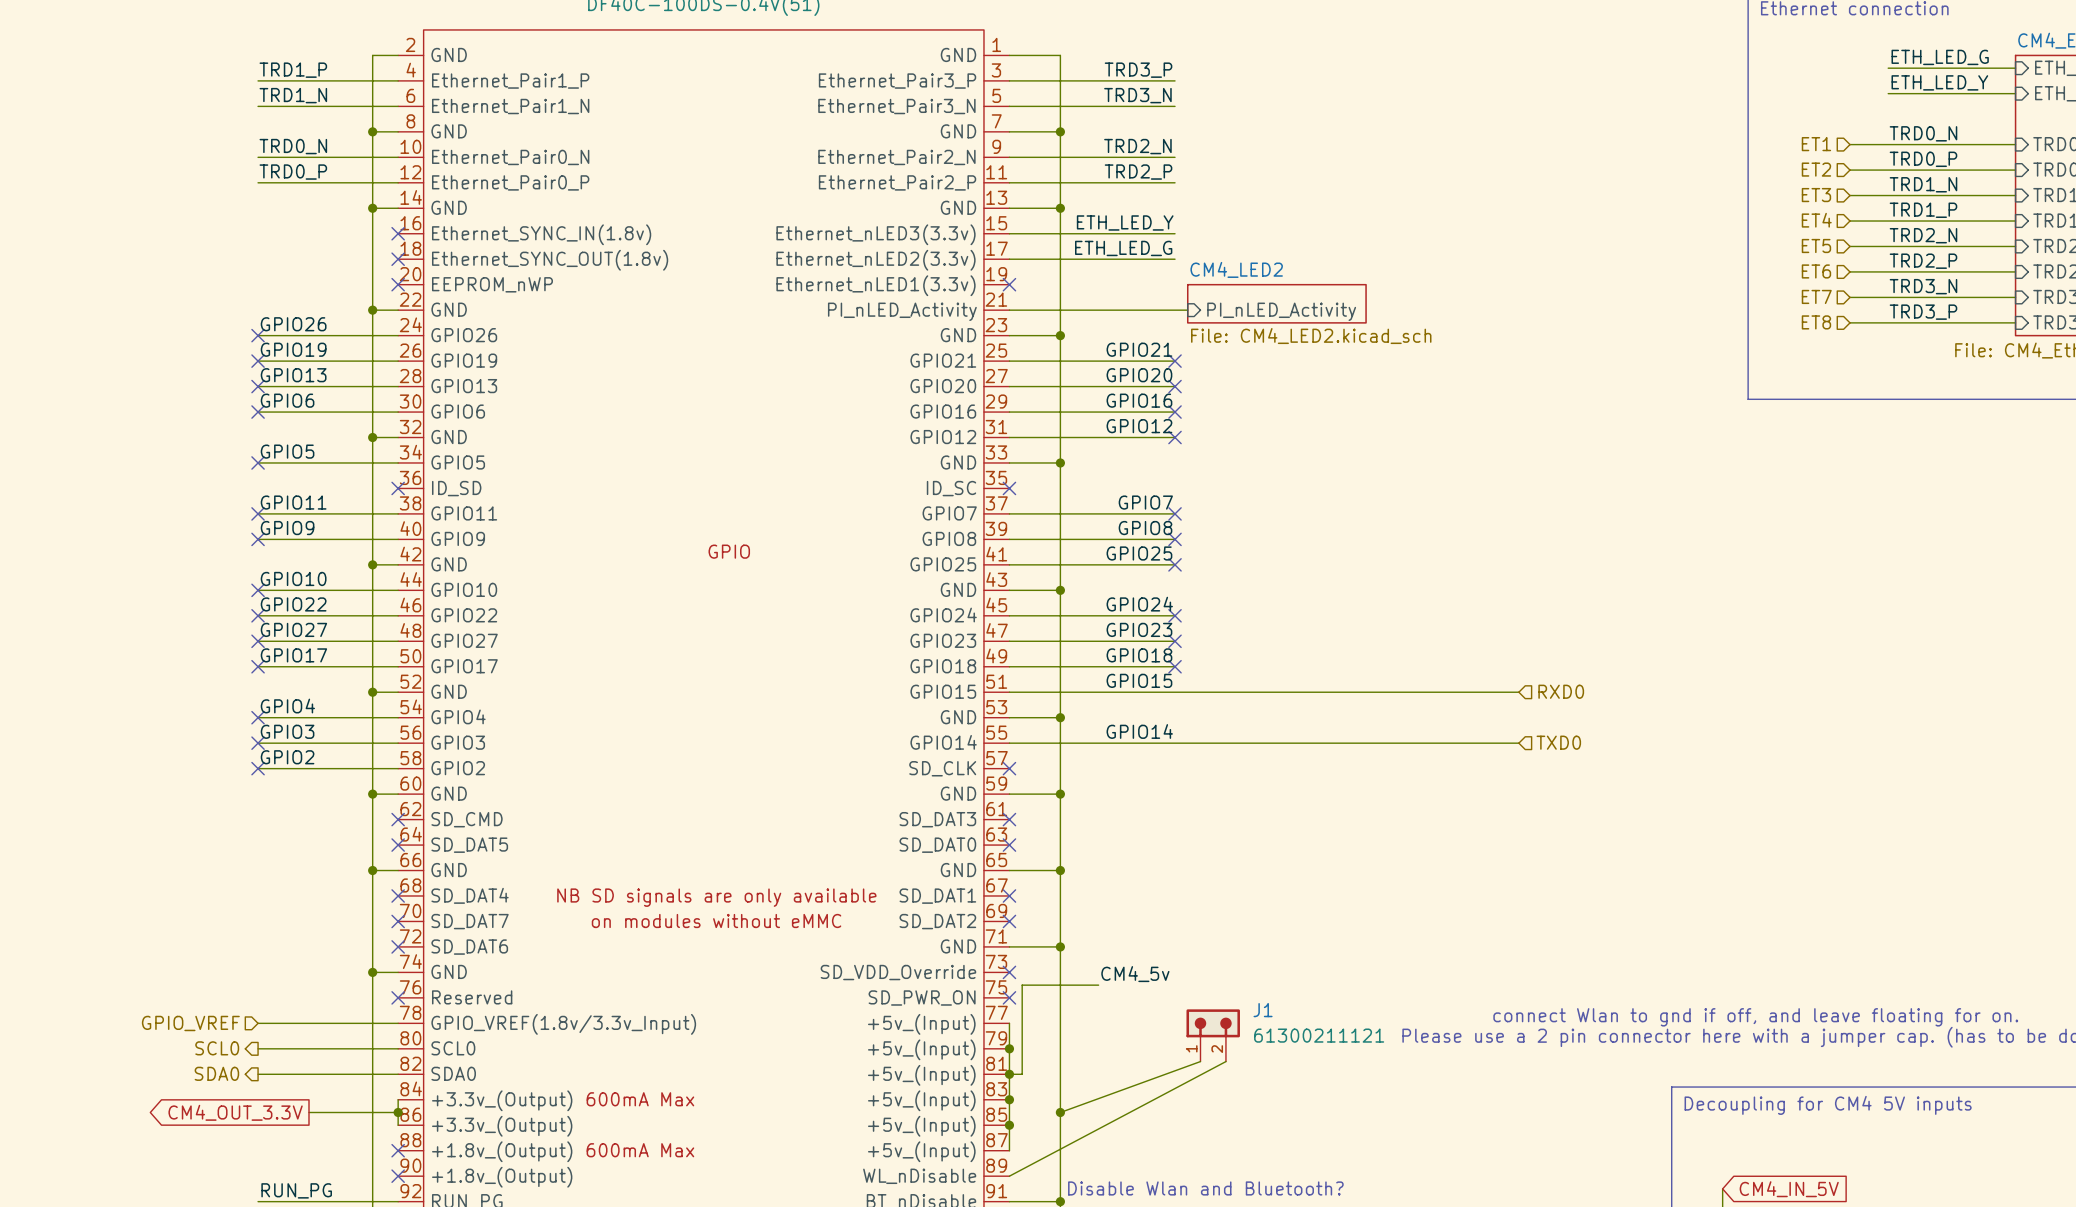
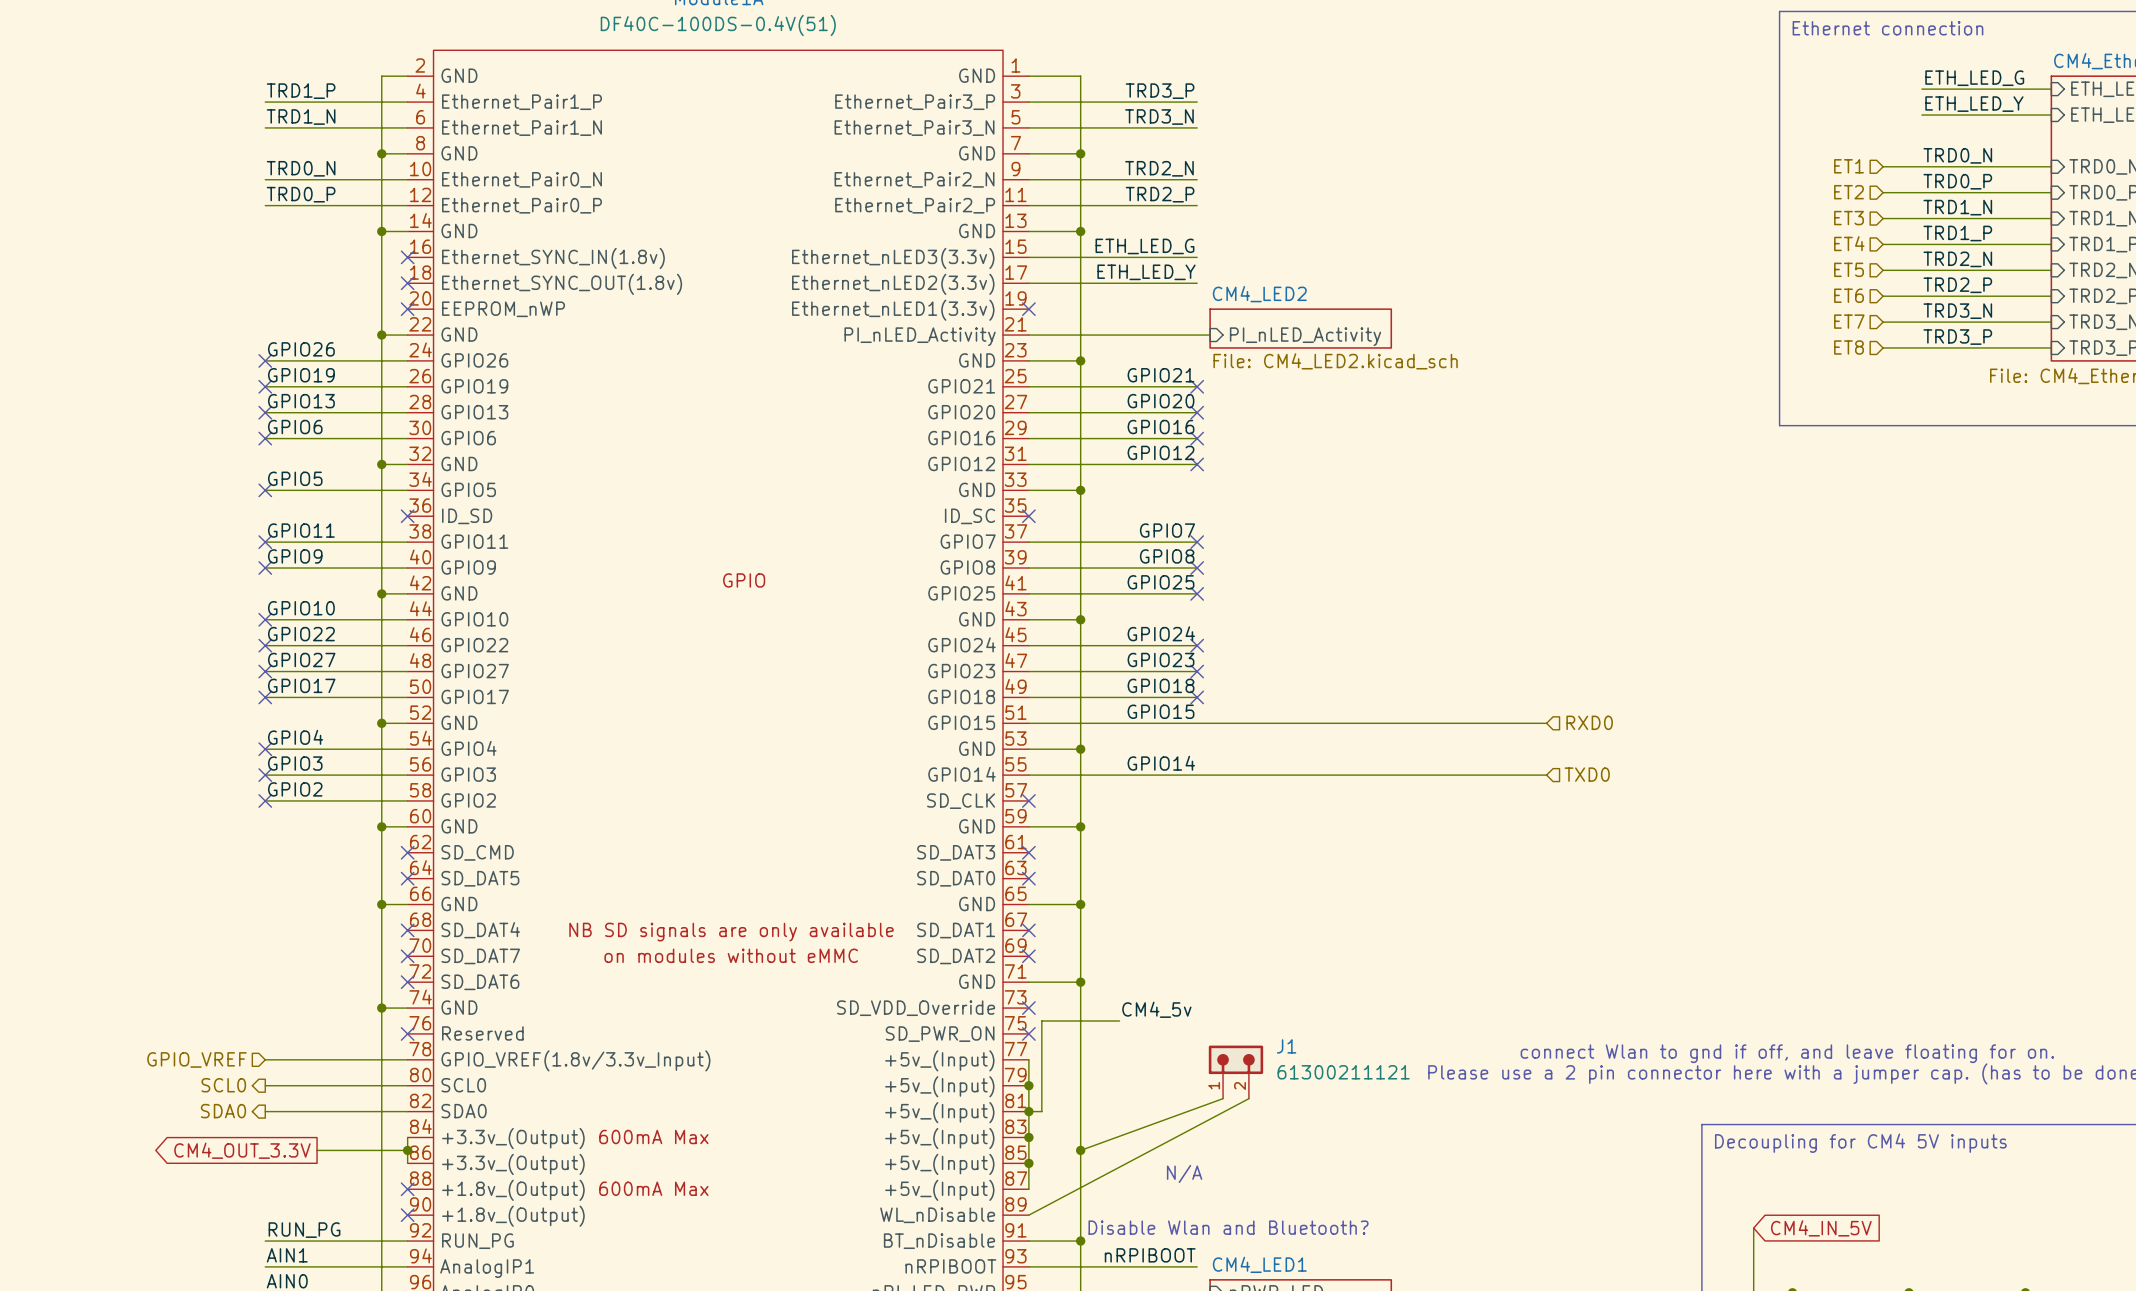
label: ETH_LED_Y (1125, 222) -> ETH_LED_G (1144, 246)
label: ETH_LED_G (1123, 248) -> ETH_LED_Y (1146, 272)
text: none -> N/A (1184, 1173)

